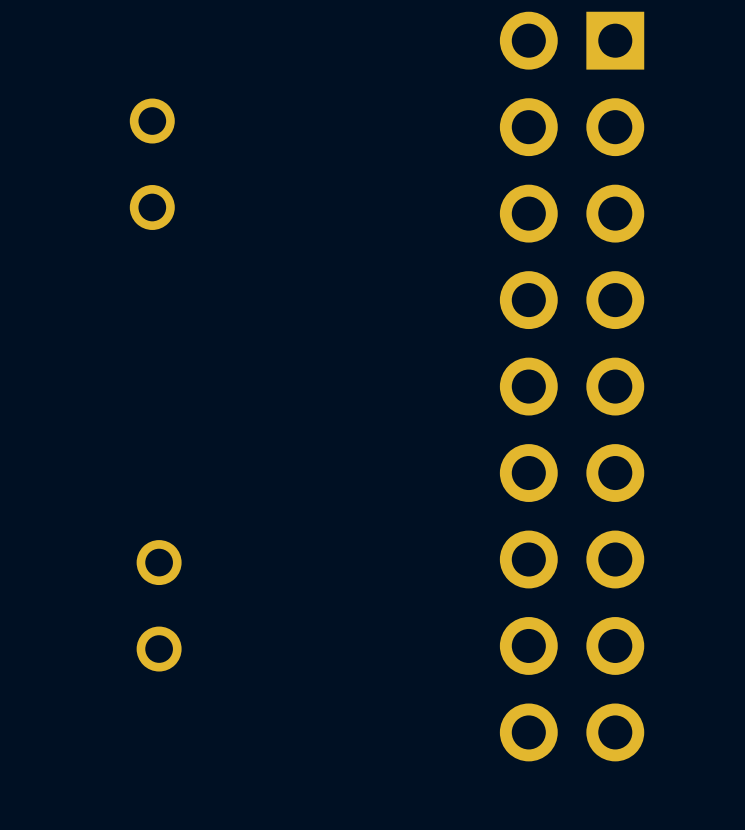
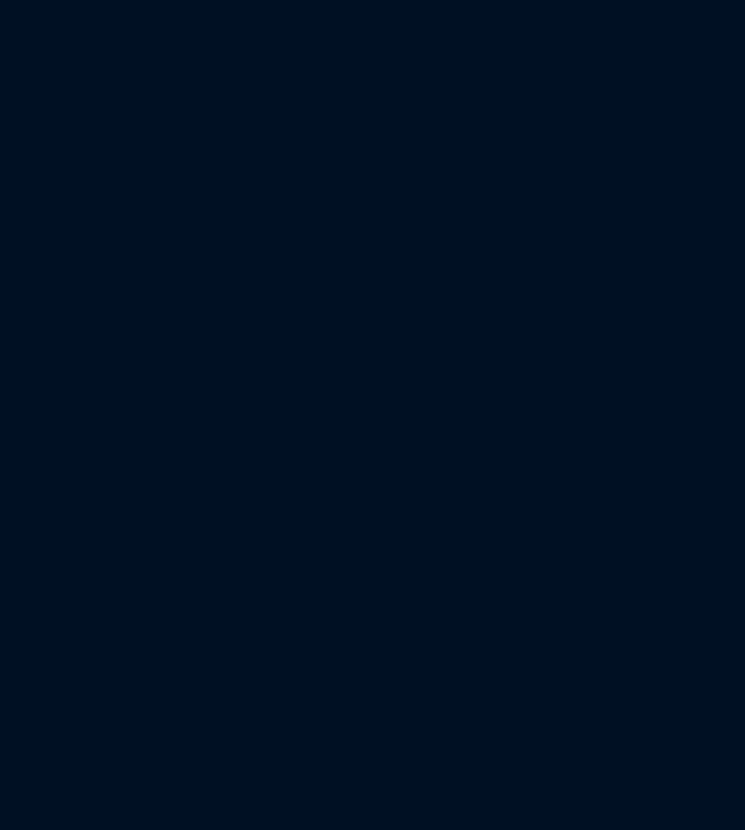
part: (152, 164) -> none
part: (572, 386) -> none
part: (159, 605) -> none

